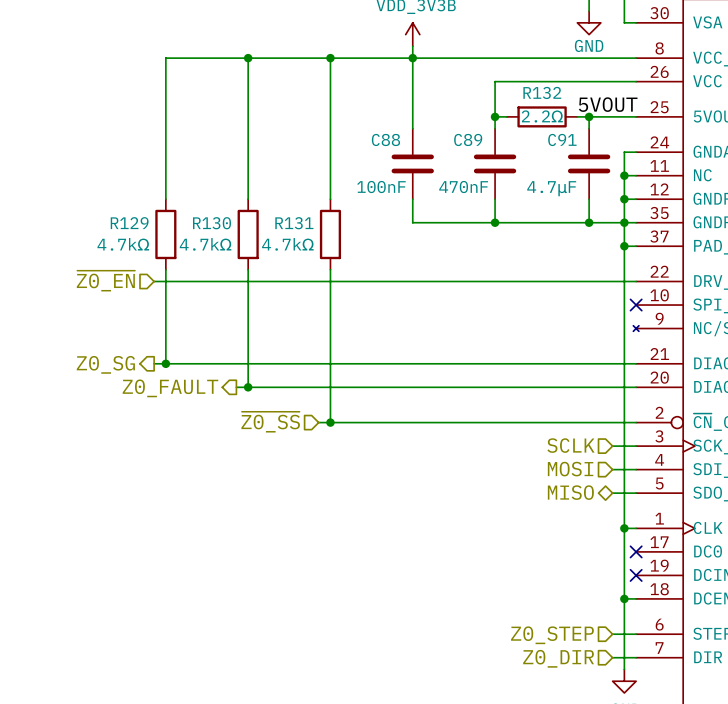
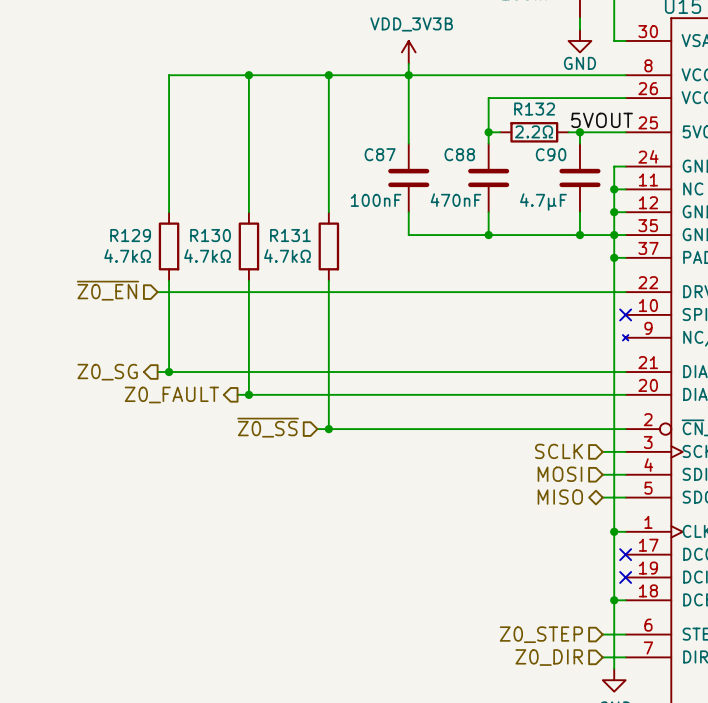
C88 name: C88 (385, 139) -> C87 (380, 154)
C89 name: C89 (468, 139) -> C88 (459, 154)
C91 name: C91 (562, 139) -> C90 (551, 154)

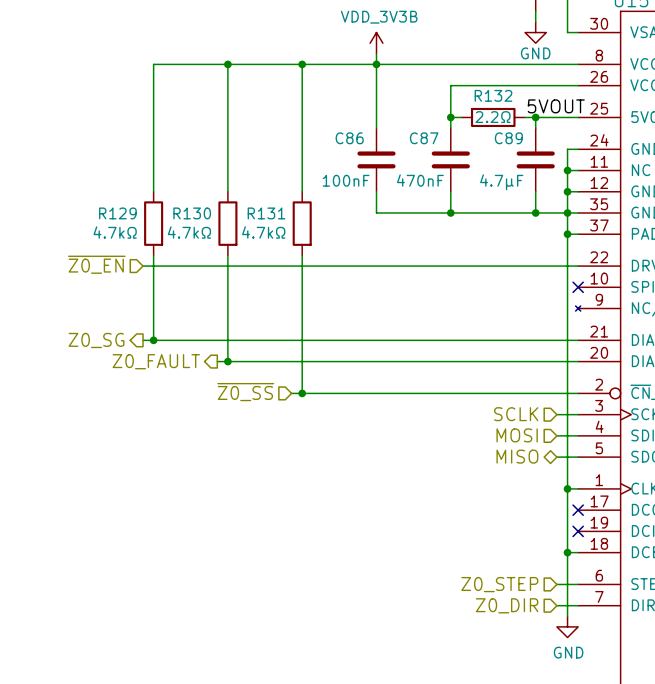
C87 name: C87 (380, 154) -> C86 (349, 138)
C88 name: C88 (459, 154) -> C87 (424, 138)
C90 name: C90 (551, 154) -> C89 (508, 138)

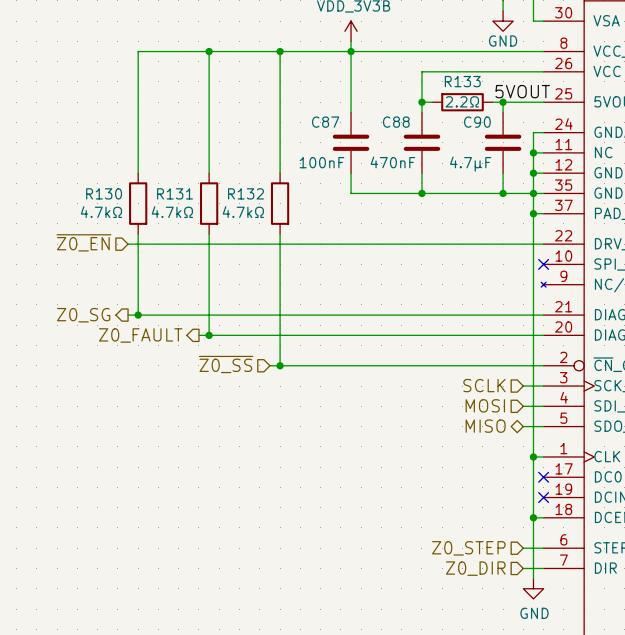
R132 name: R132 (493, 95) -> R133 (462, 81)
C86 name: C86 (349, 138) -> C87 (325, 122)
C87 name: C87 (424, 138) -> C88 (396, 122)
C89 name: C89 (508, 138) -> C90 (477, 122)
R129 name: R129 (117, 213) -> R130 (104, 193)
R130 name: R130 (192, 213) -> R131 (175, 193)
R131 name: R131 (266, 213) -> R132 (245, 193)

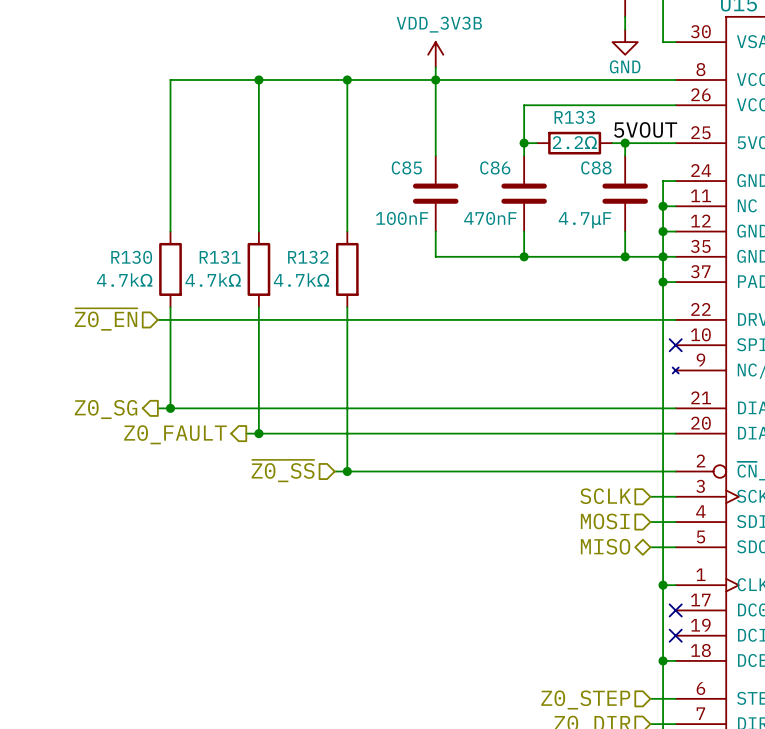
C87 name: C87 (325, 122) -> C85 (406, 167)
C88 name: C88 (396, 122) -> C86 (495, 167)
C90 name: C90 (477, 122) -> C88 (596, 167)

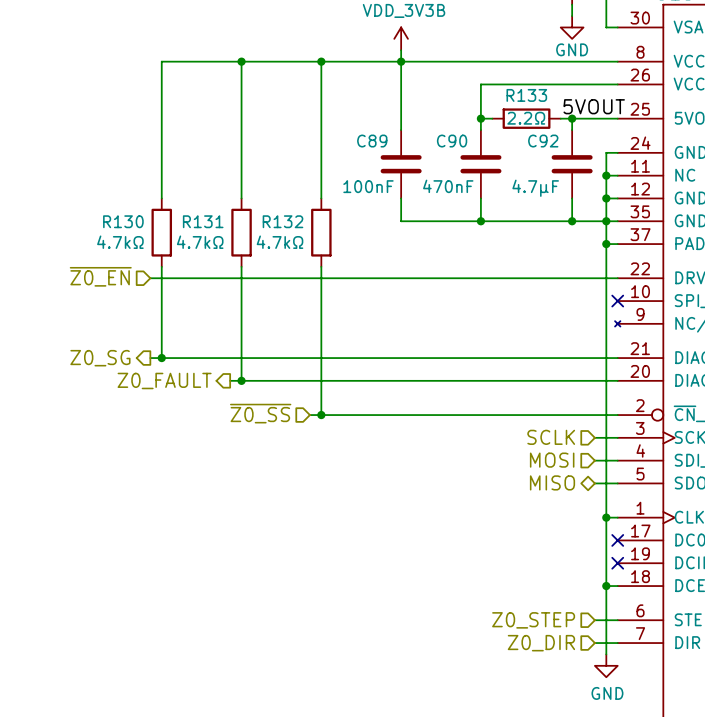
C85 name: C85 (406, 167) -> C89 (372, 141)
C86 name: C86 (495, 167) -> C90 (452, 141)
C88 name: C88 (596, 167) -> C92 (543, 141)

